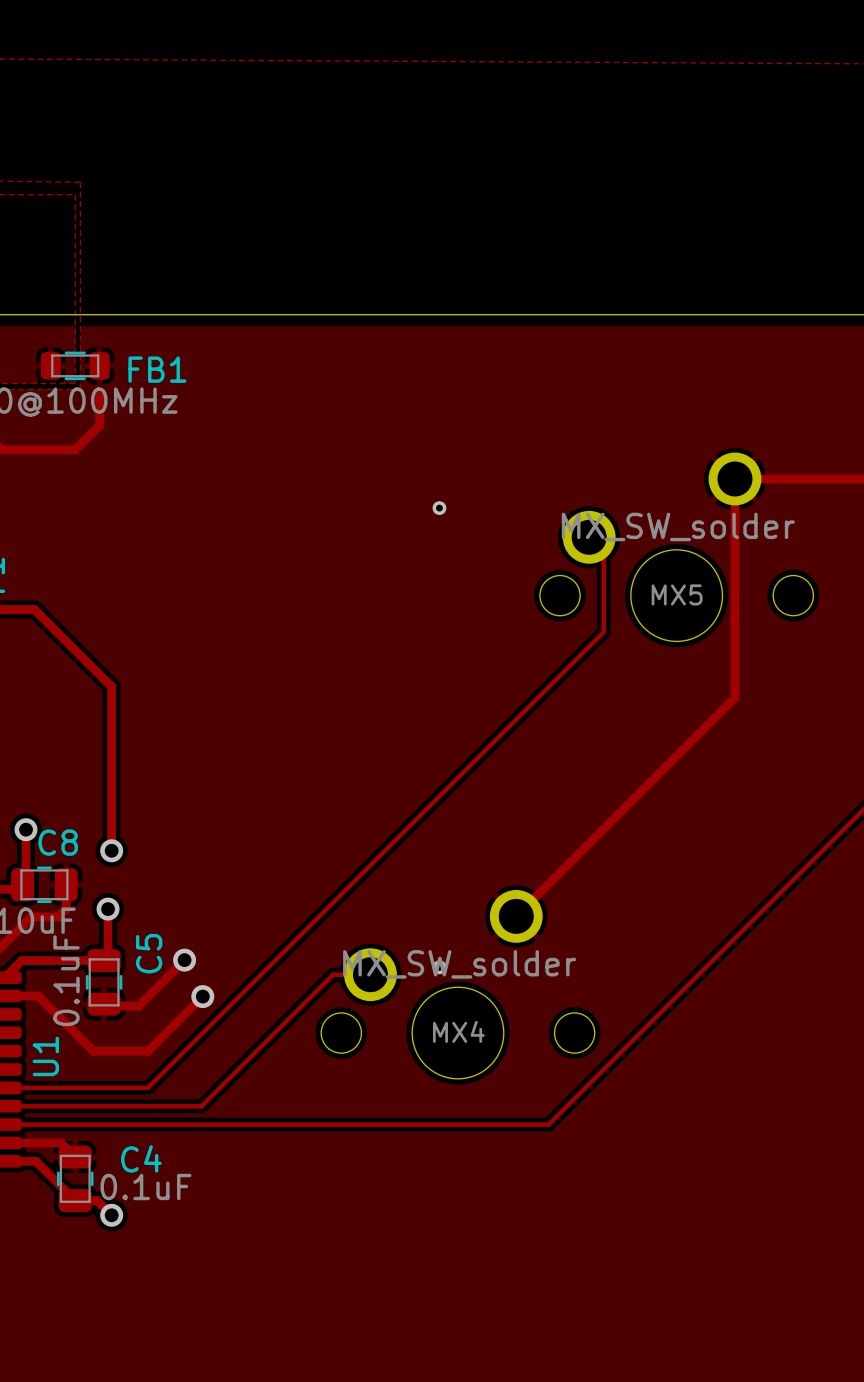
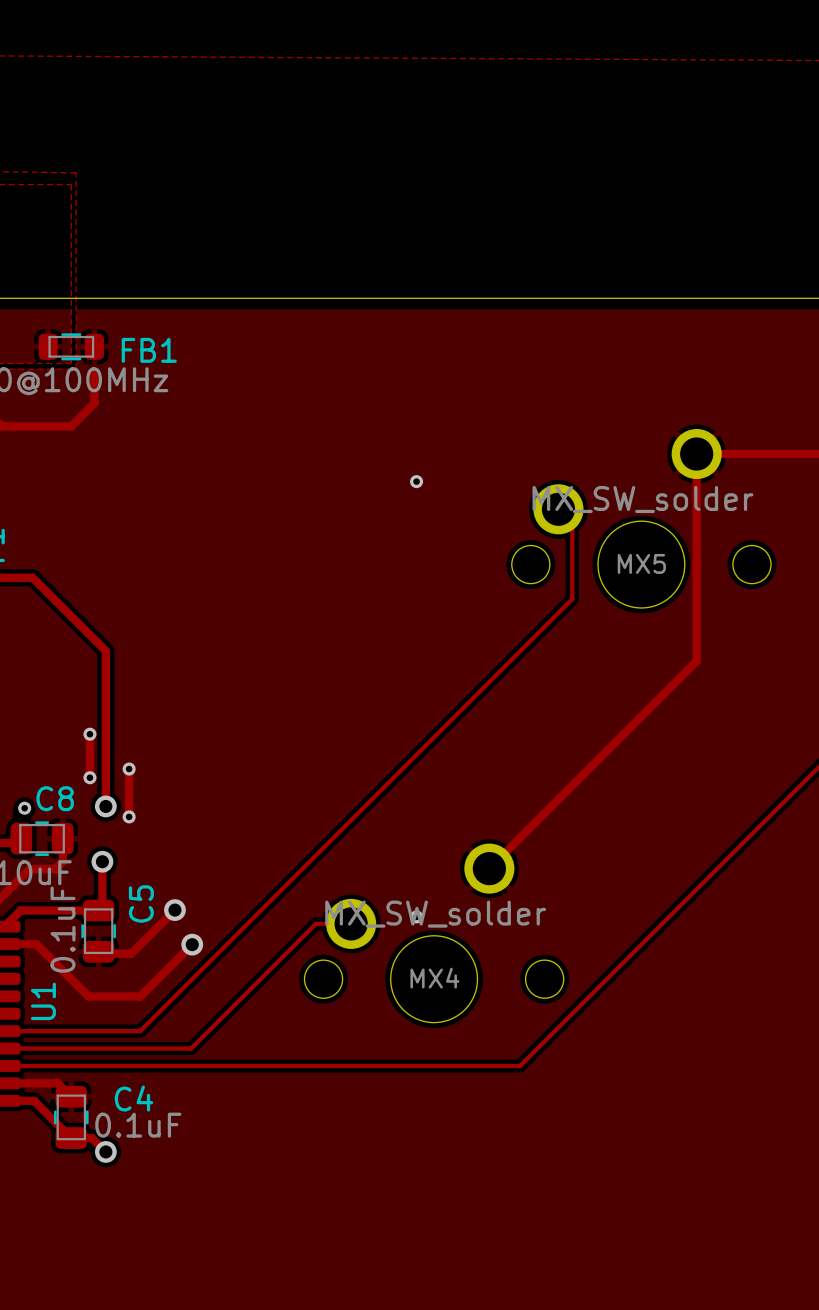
track: none -> (89, 734) (89, 777)
via: none -> (89, 734)
track: none -> (129, 769) (129, 816)
via: none -> (129, 769)
via: none -> (89, 777)
track: (26, 829) (26, 881) (22, 884) -> none
via: (26, 829) -> none
via: none -> (24, 808)
via: none -> (129, 816)

